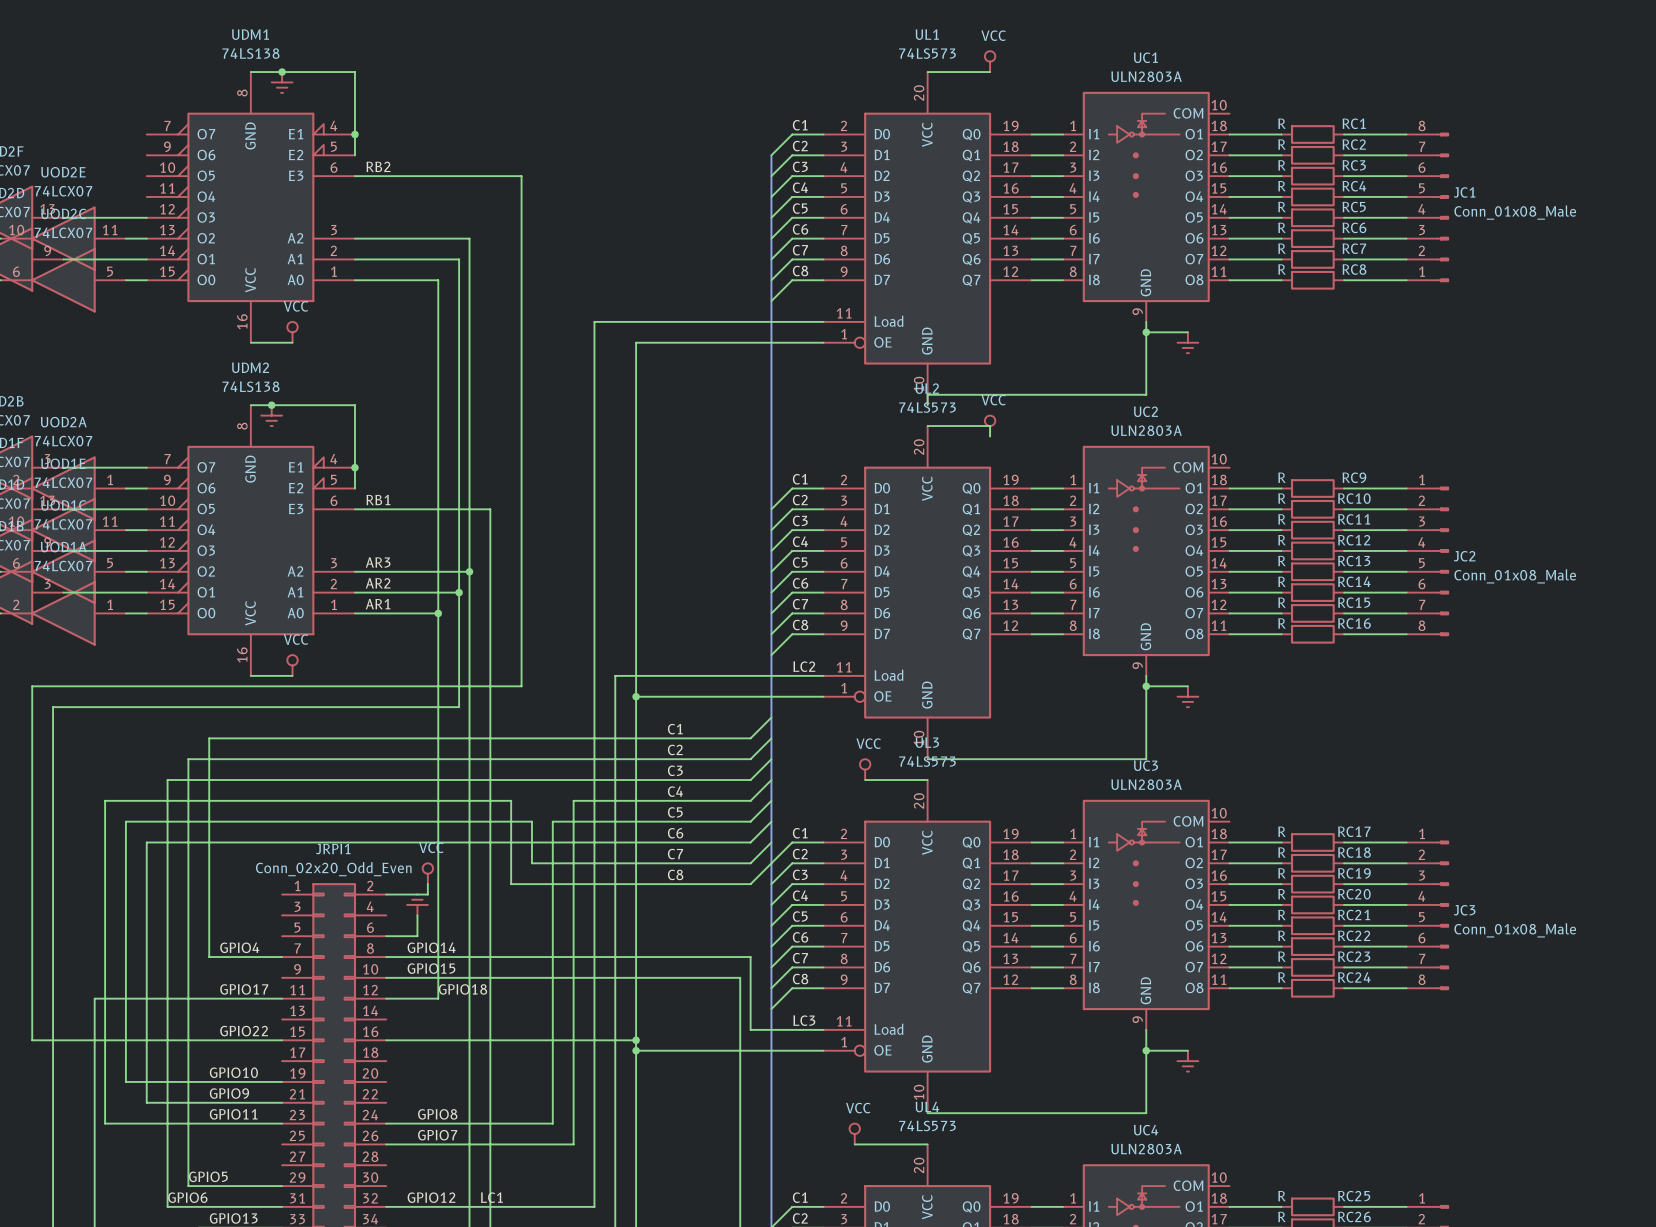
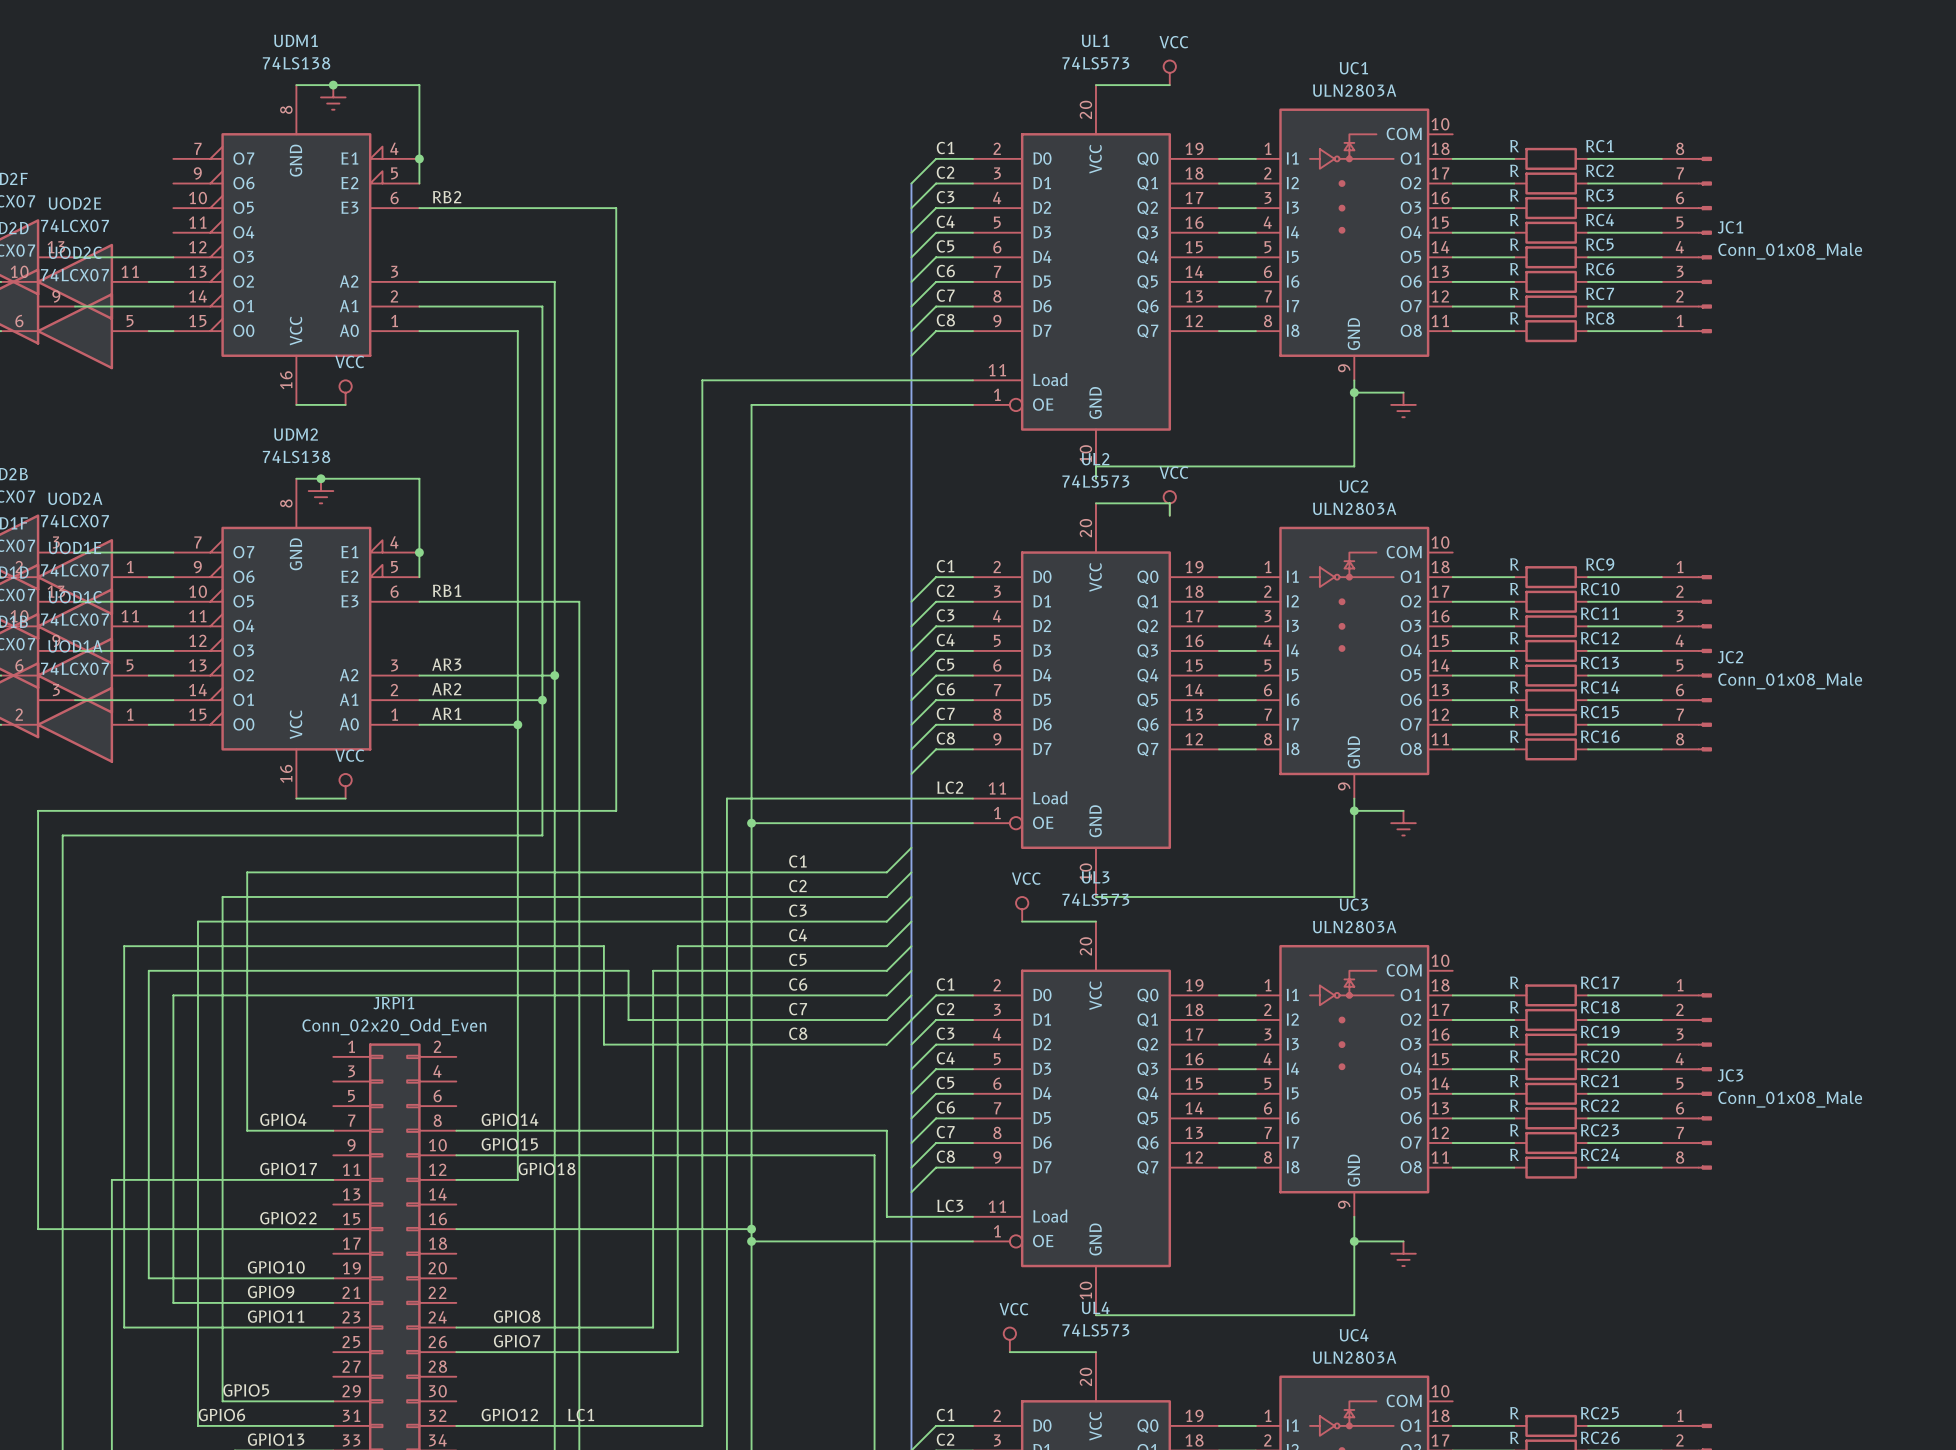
power symbol: VCC (427, 873) -> none
wire: (427, 884) (427, 894) (386, 894) -> none
power symbol: (417, 904) -> none
wire: (417, 915) (417, 936) (386, 936) -> none

